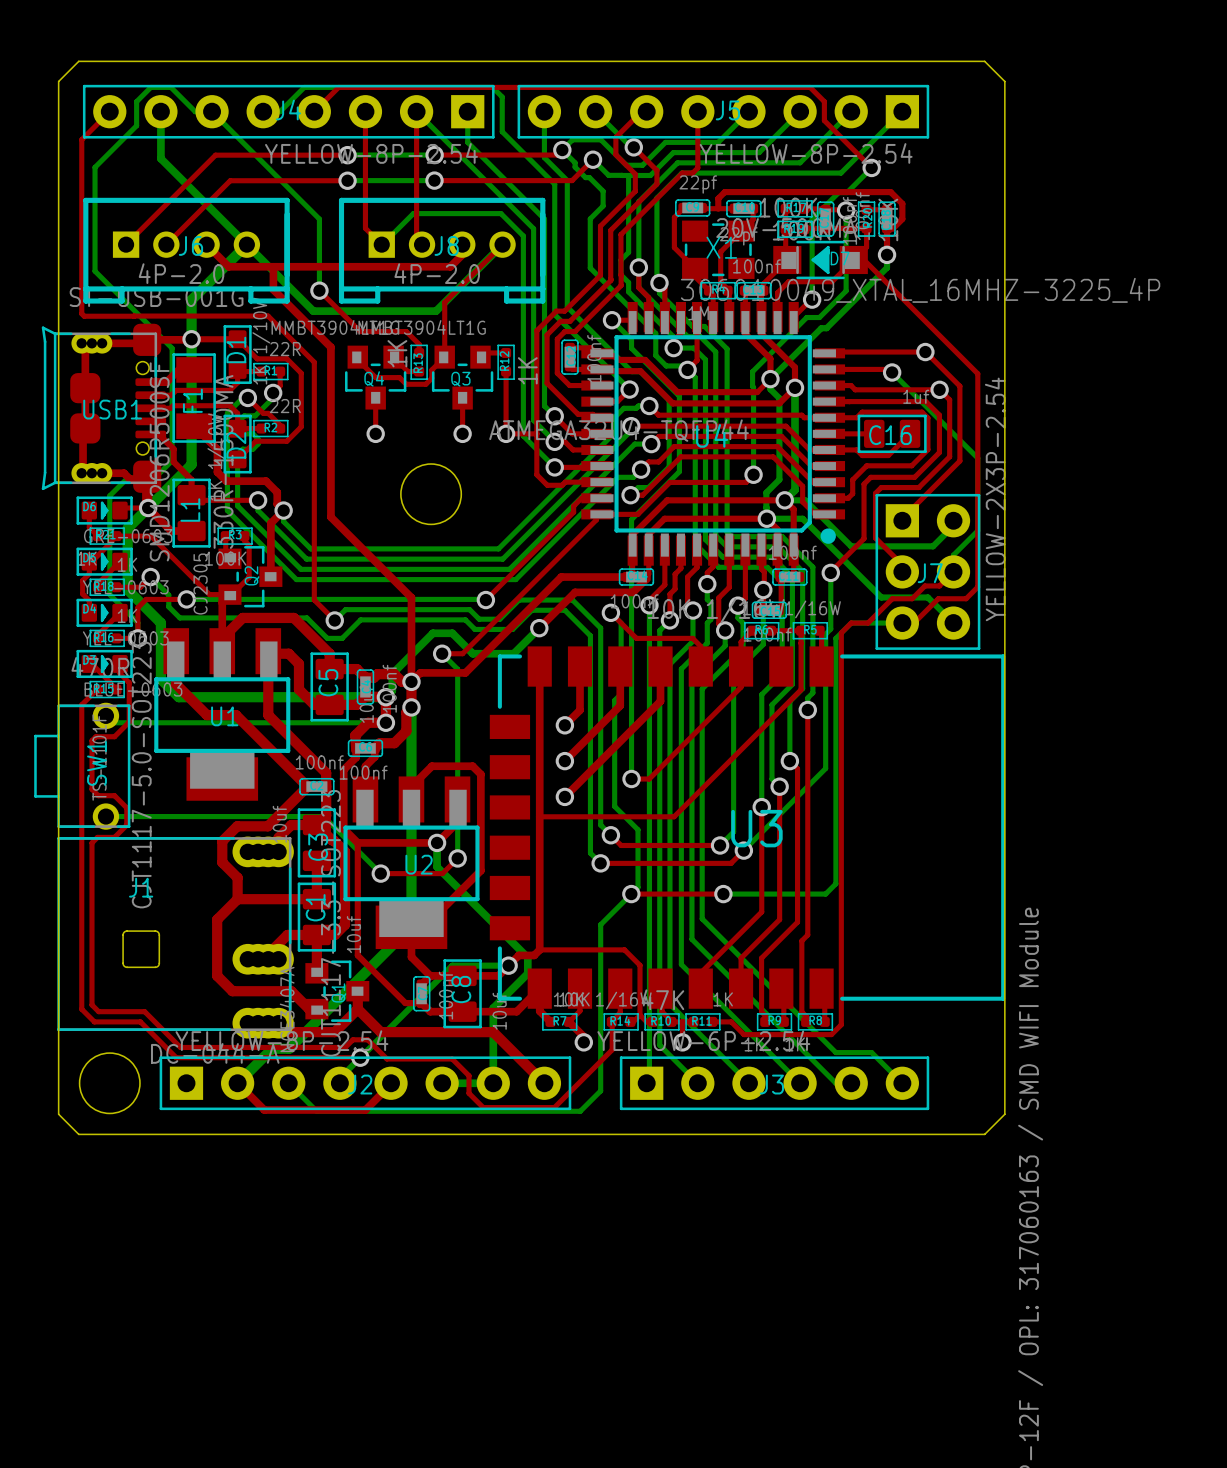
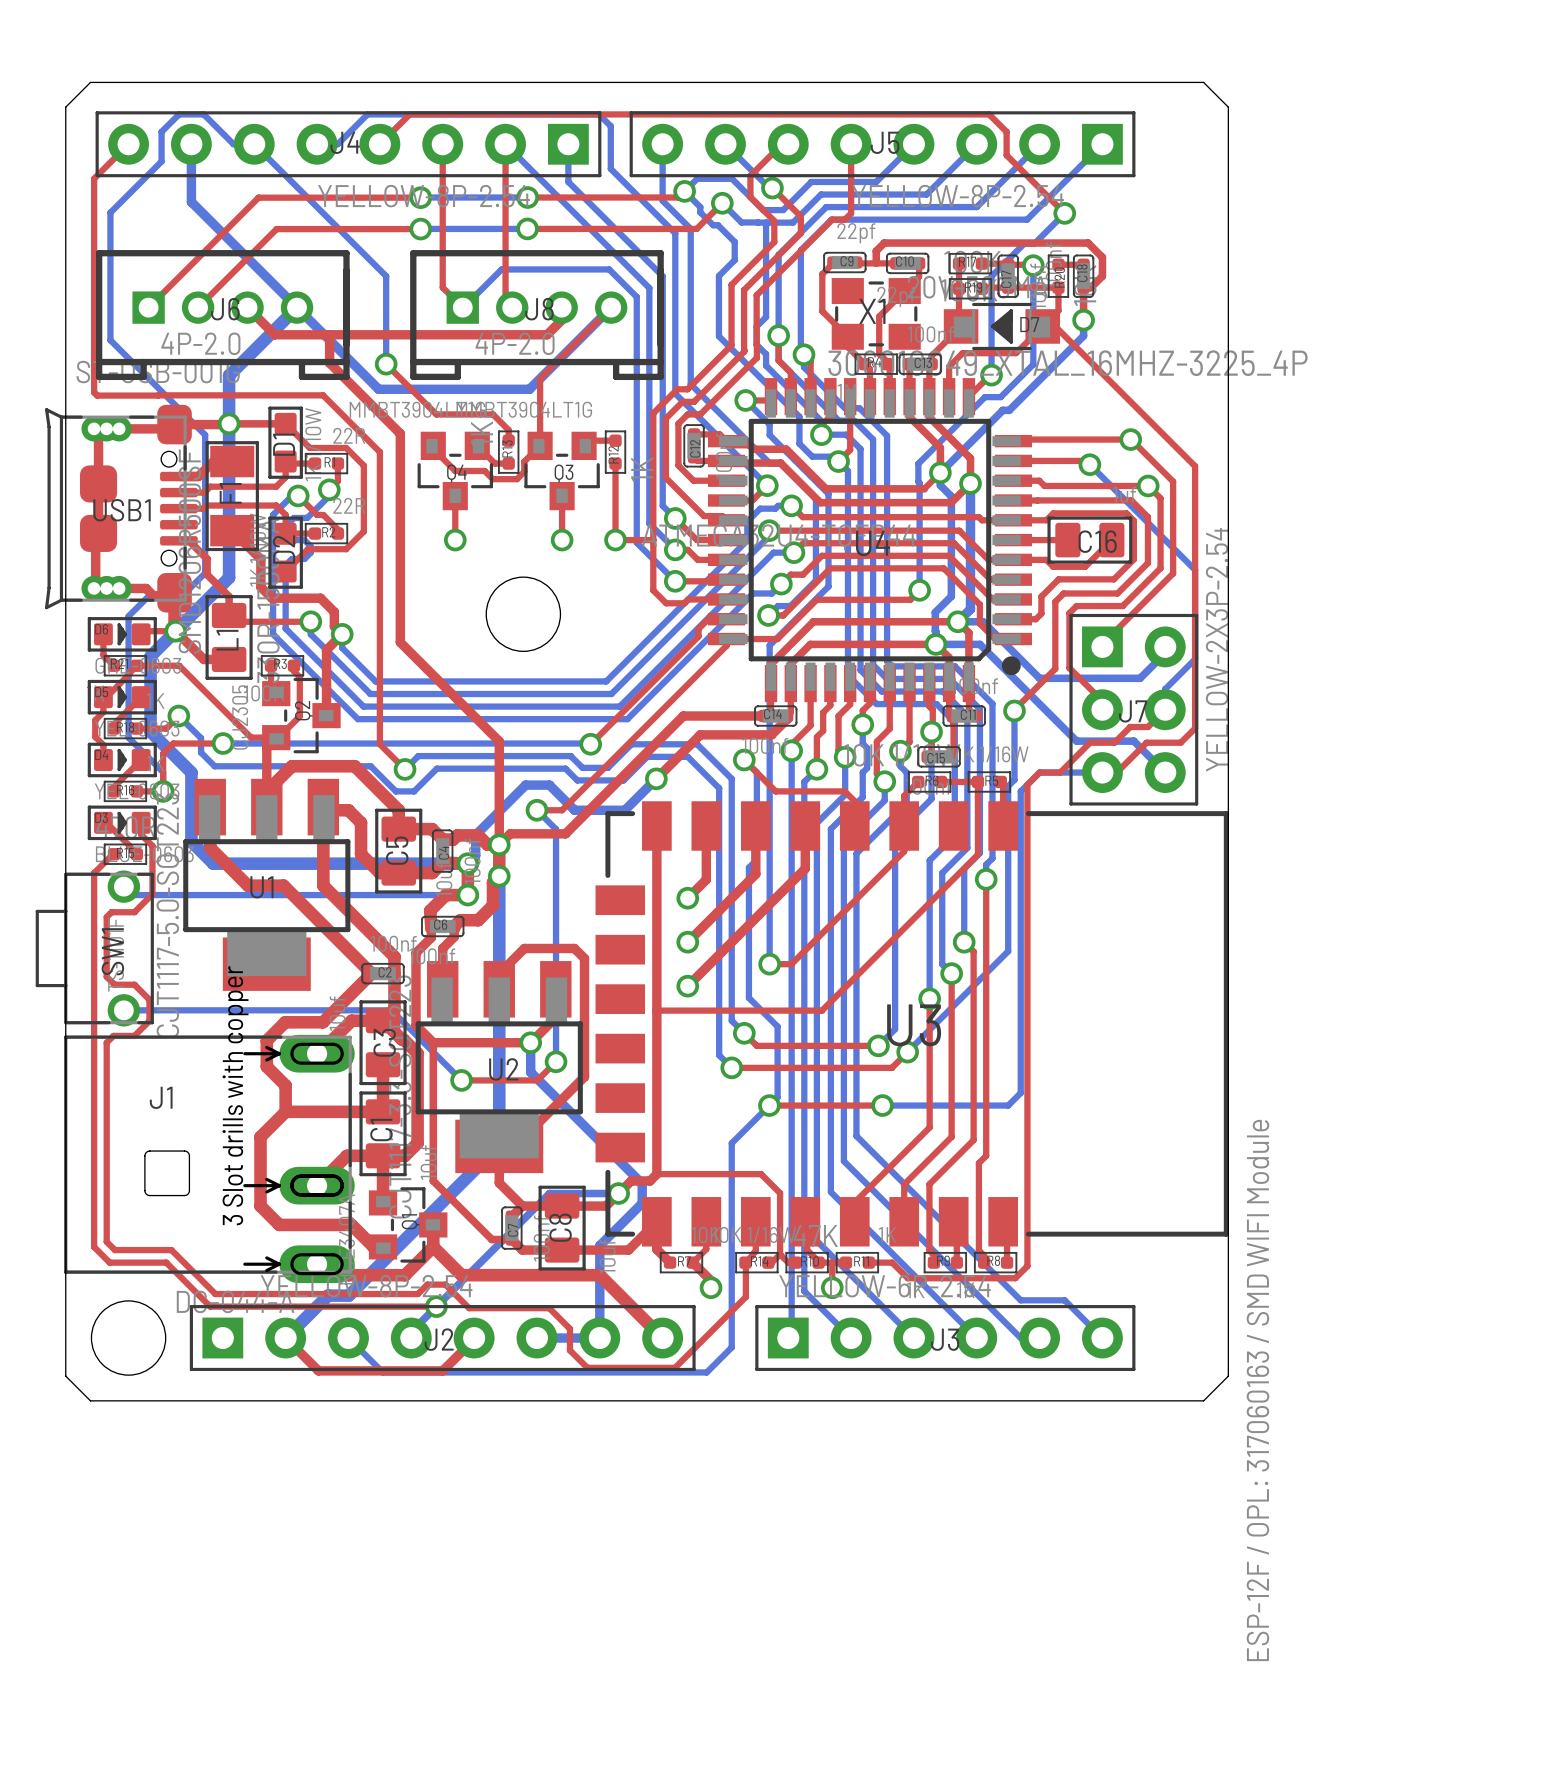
J1 footprint: [57, 836, 294, 1039] -> [64, 1034, 355, 1284]

